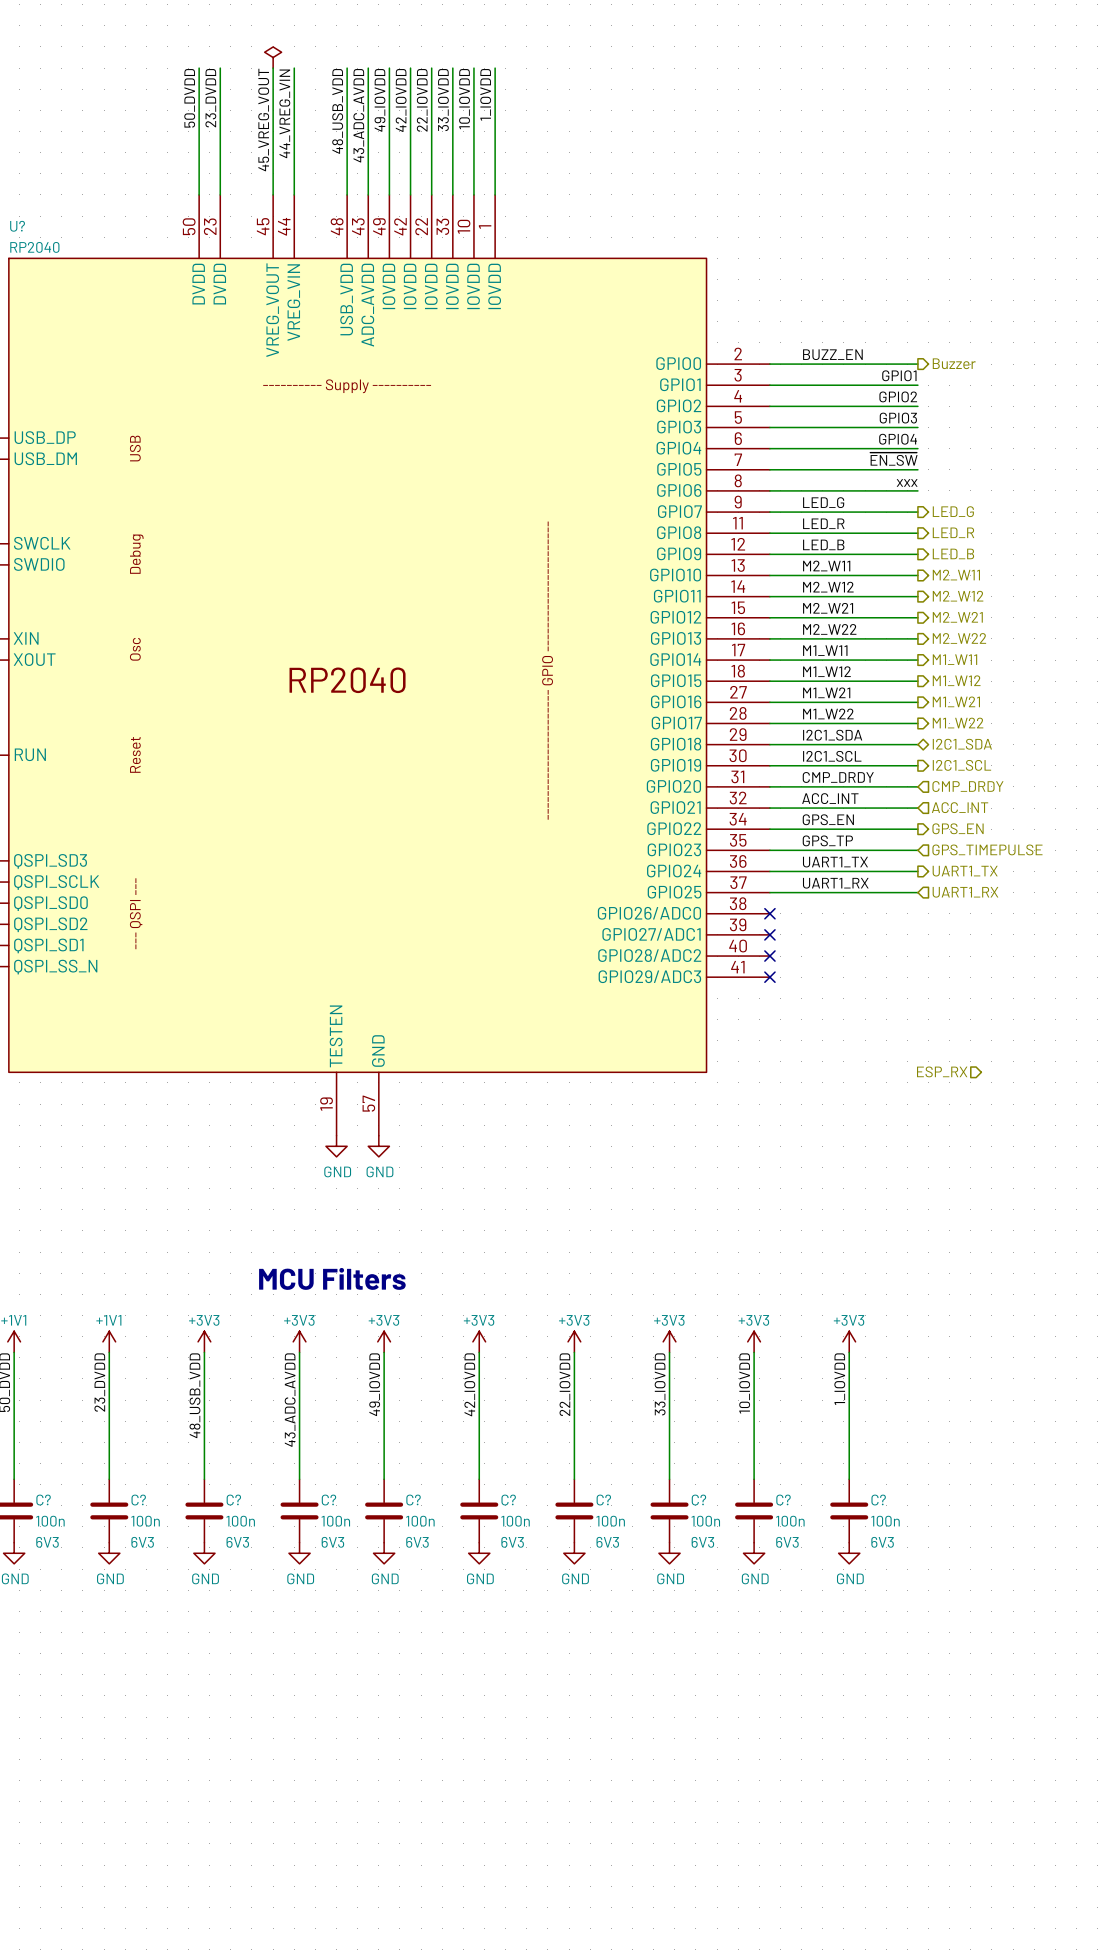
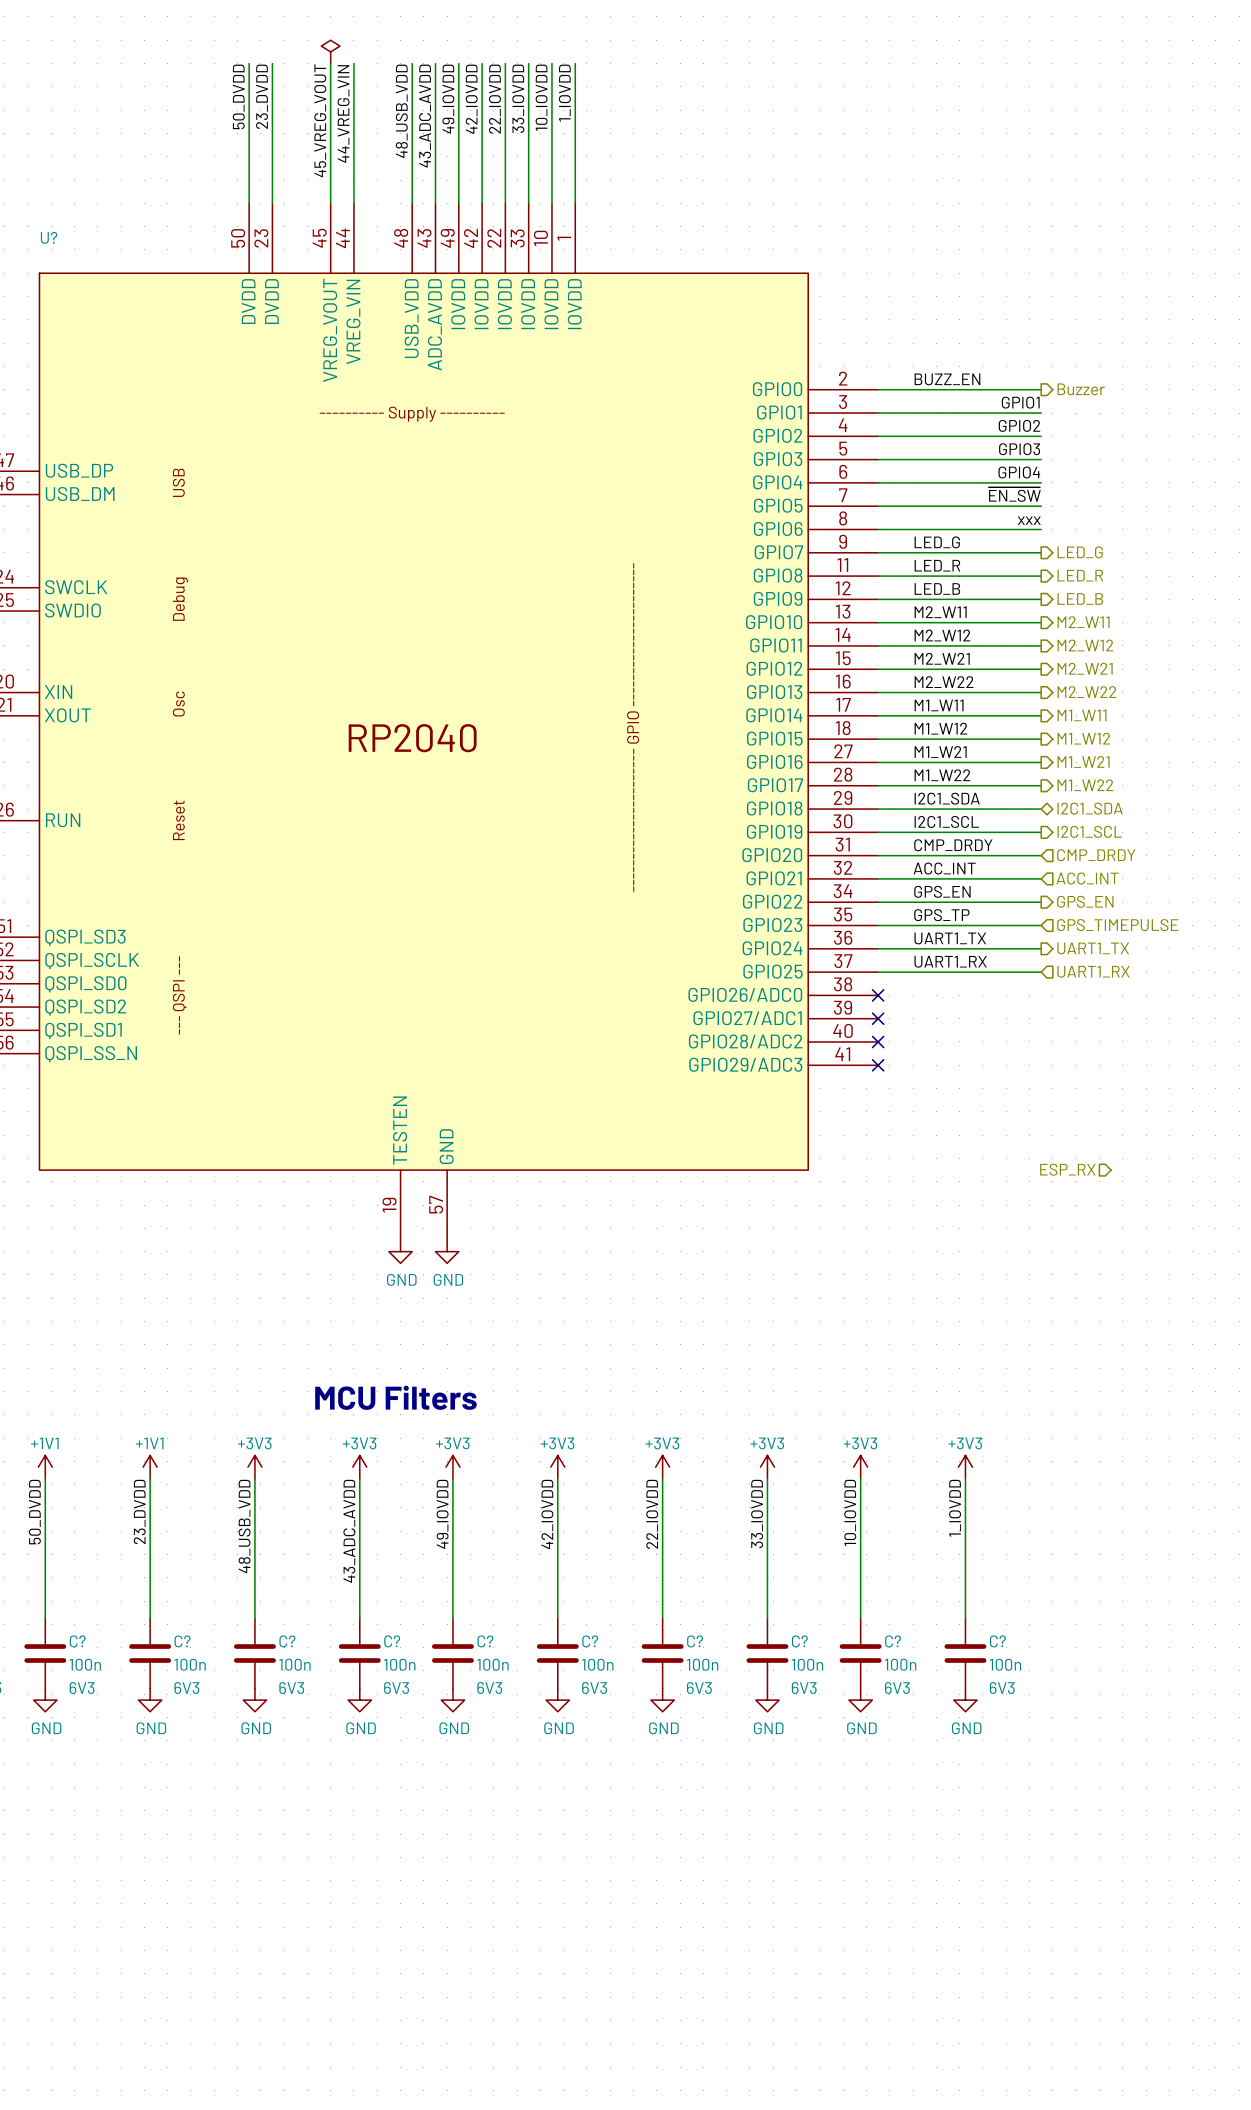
U? value: RP2040 (34, 247) -> none

